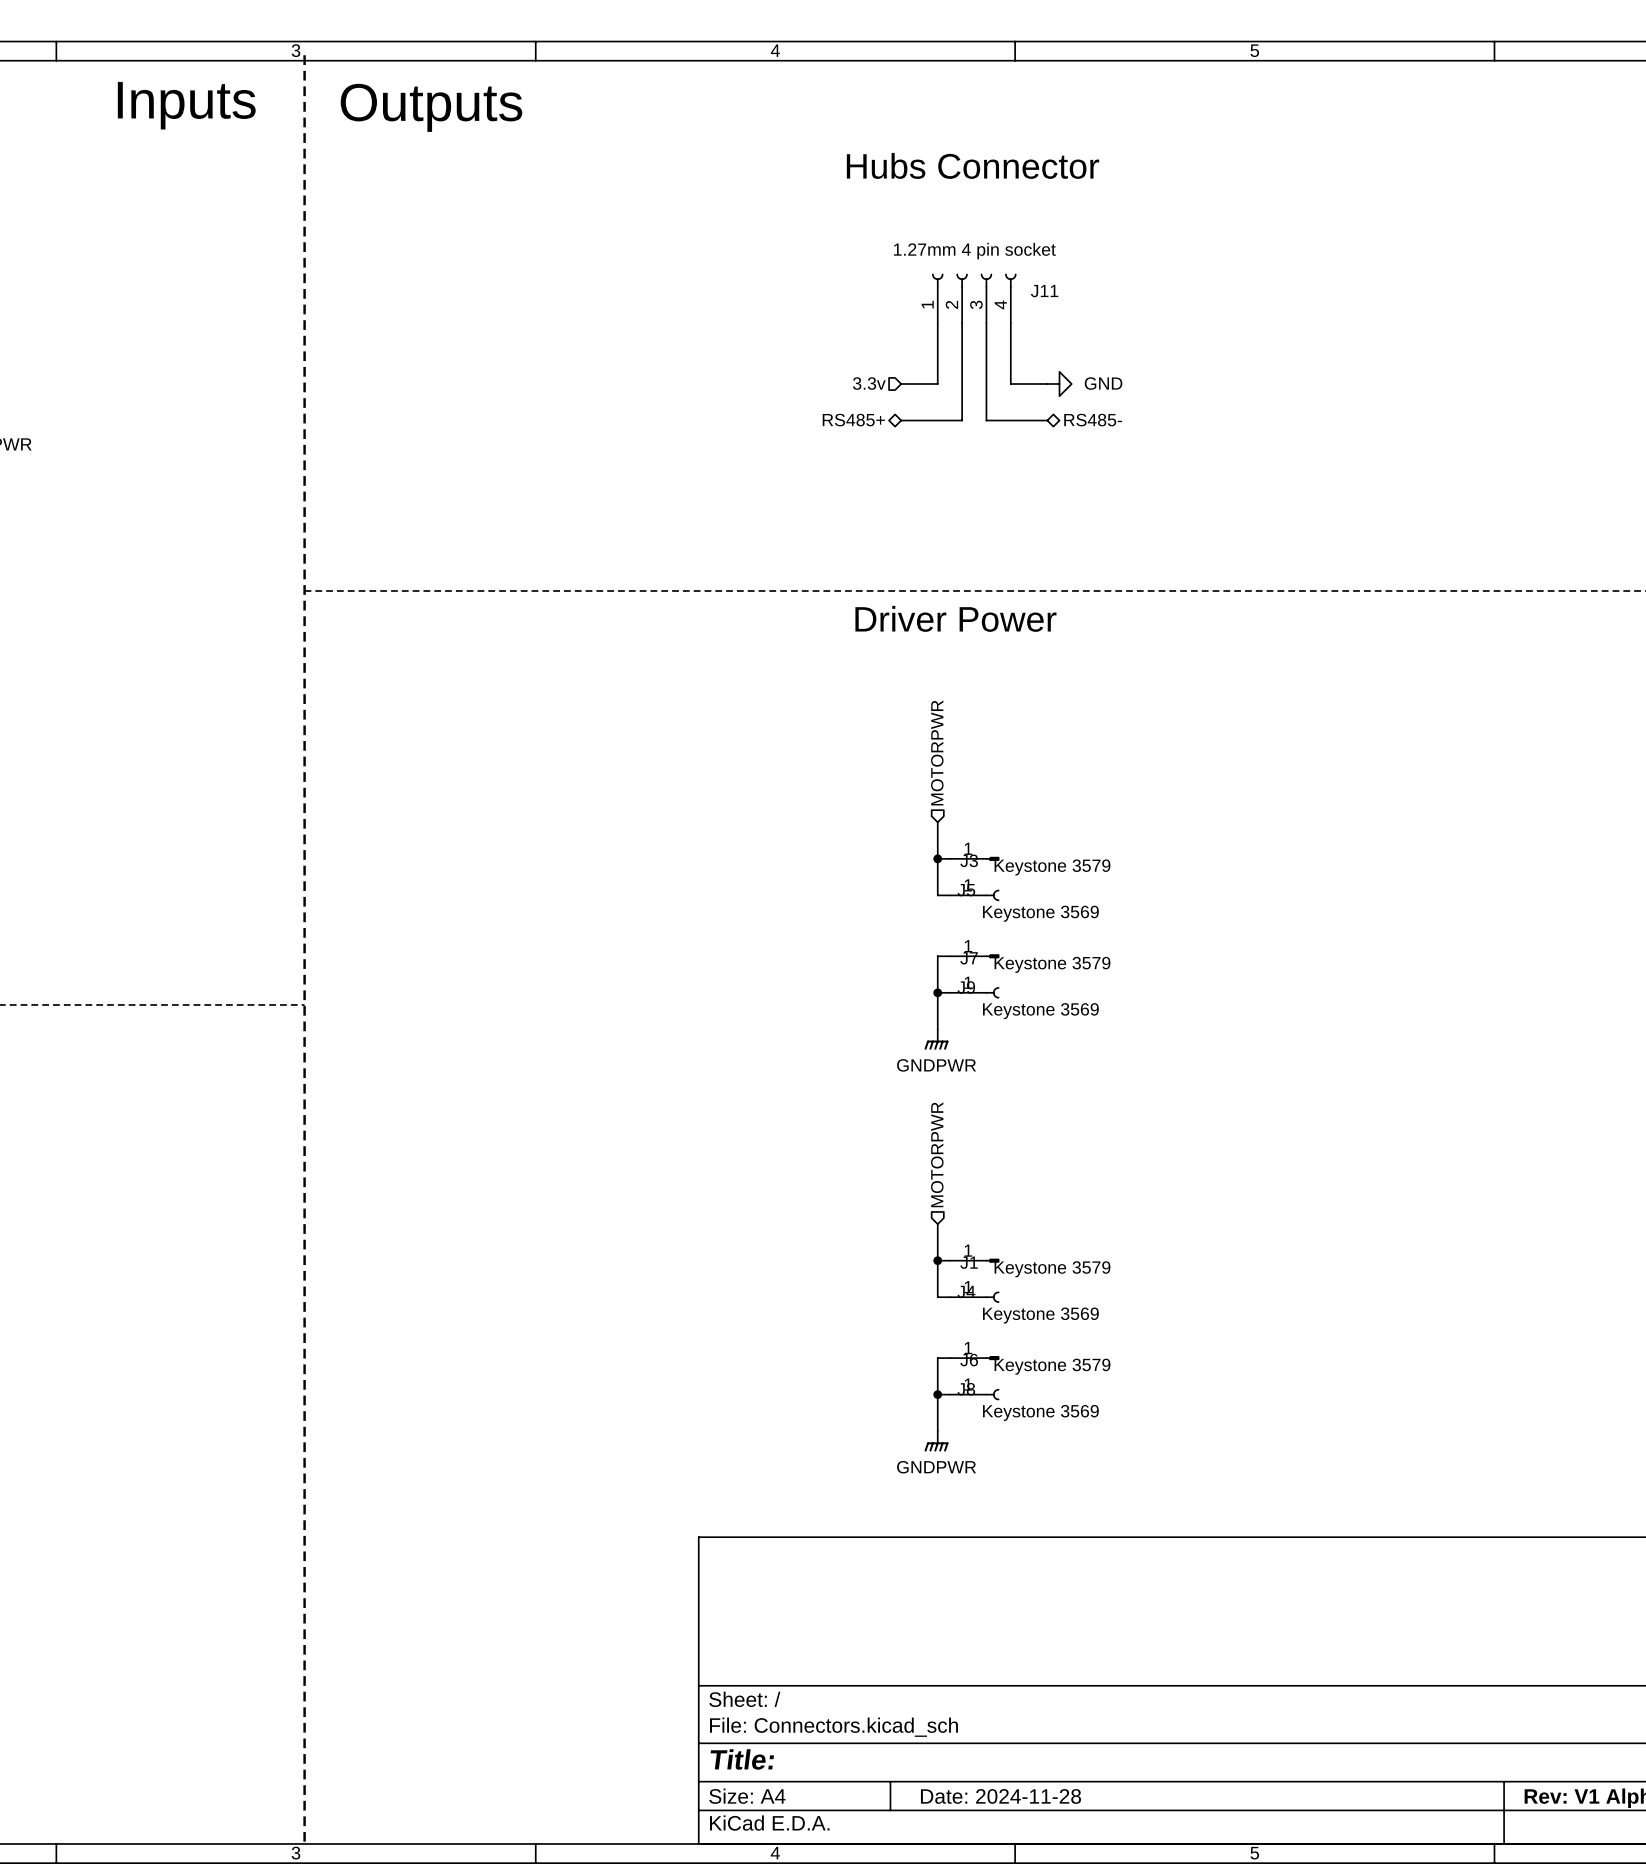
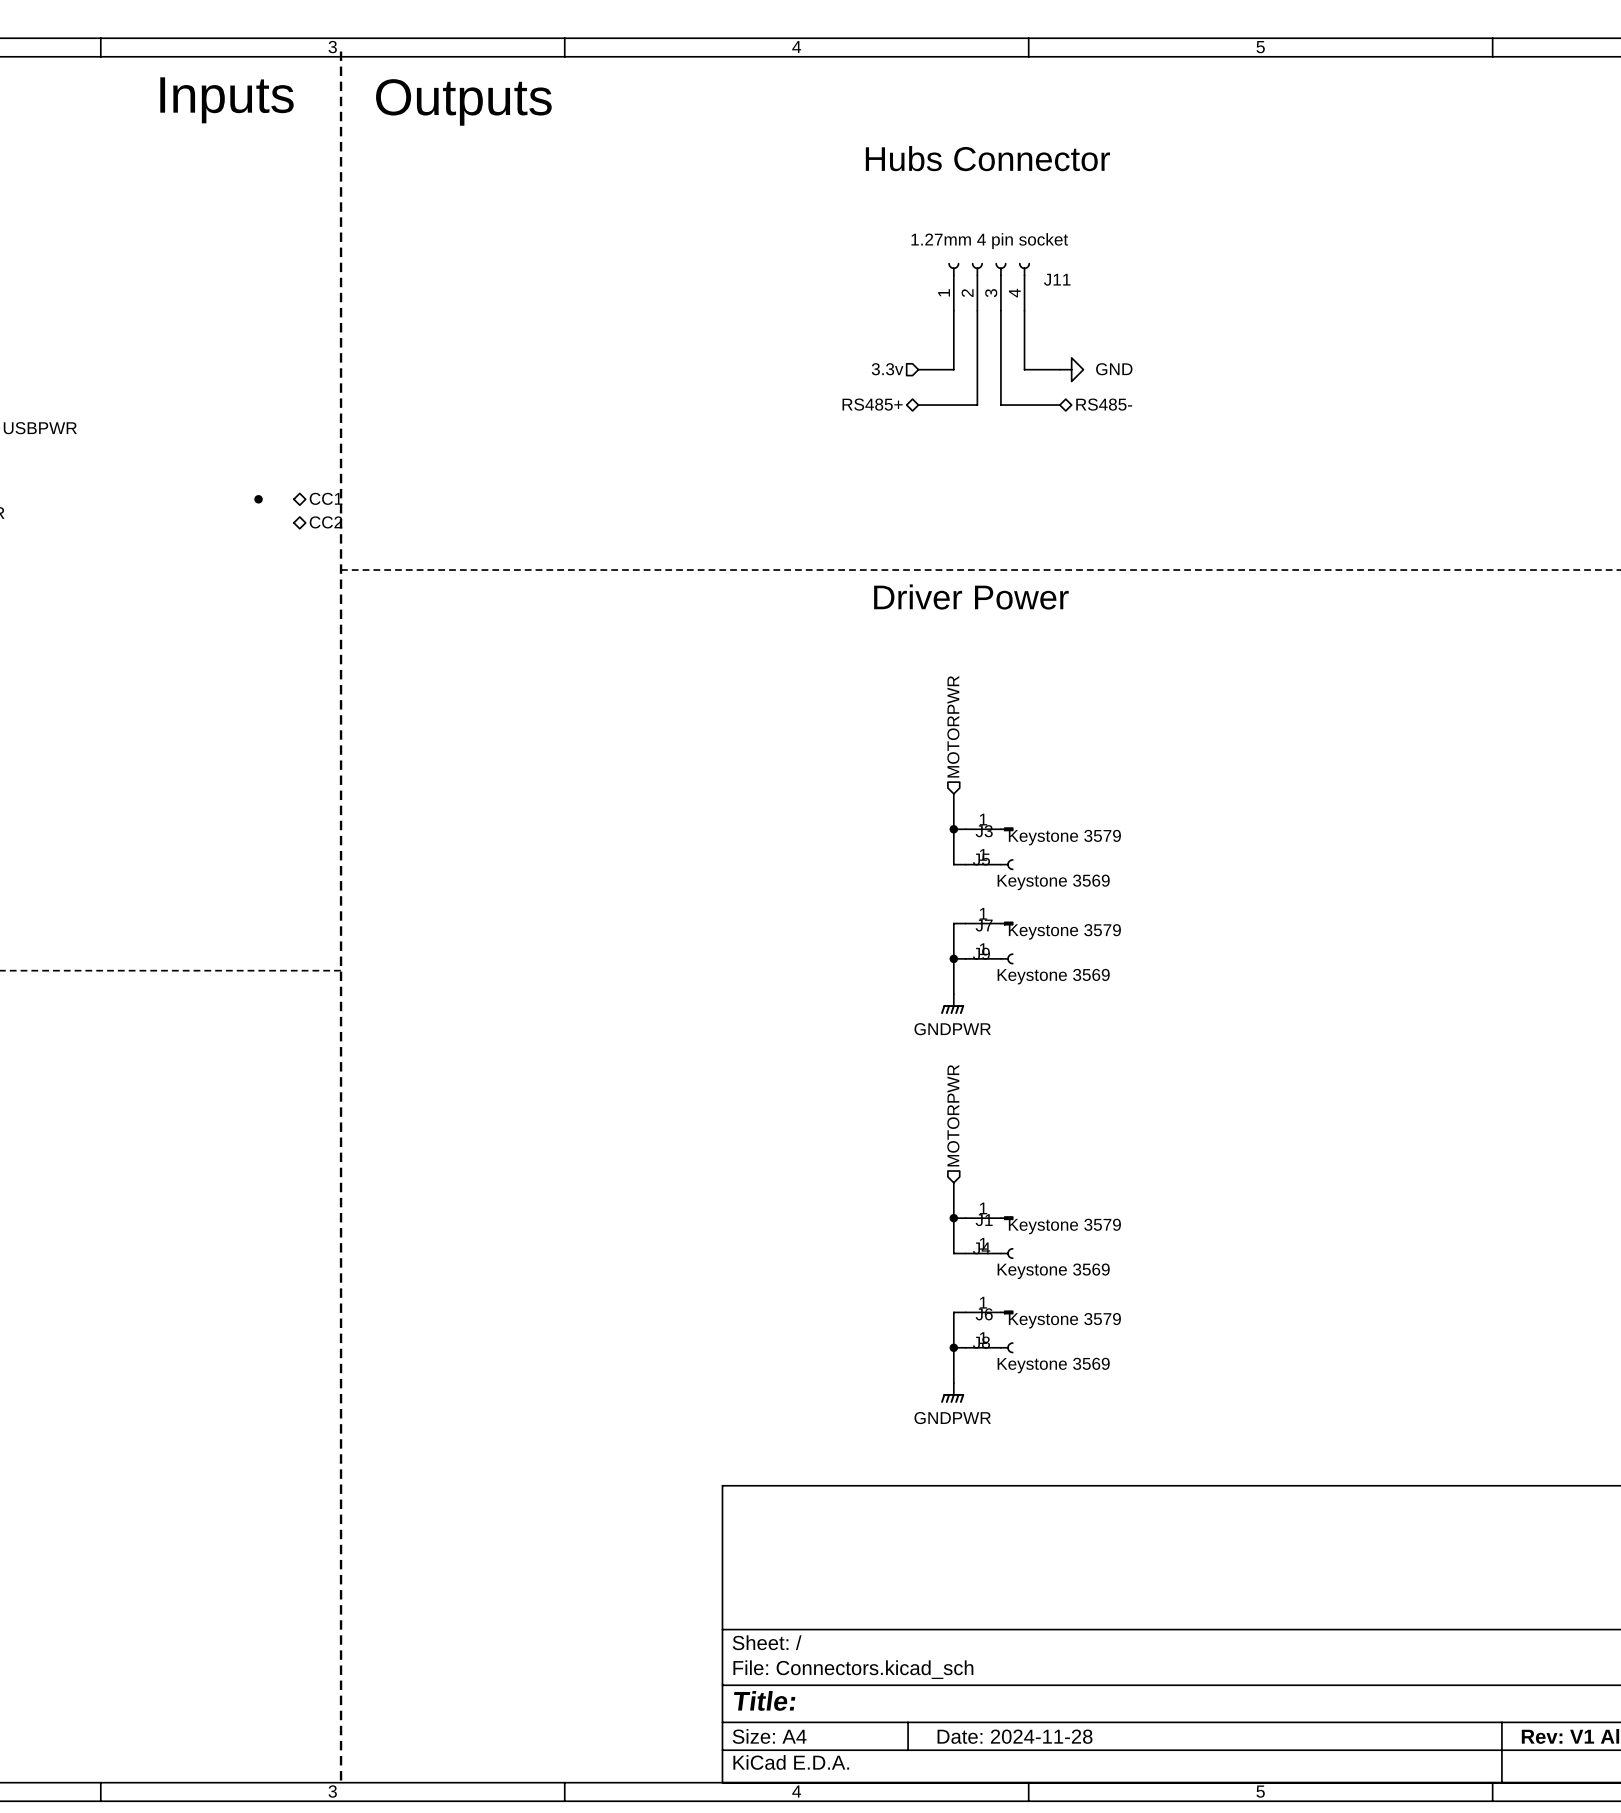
junction: none -> (258, 499)
hierarchical label: none -> CC1 (326, 498)
hierarchical label: none -> CC2 (325, 522)

